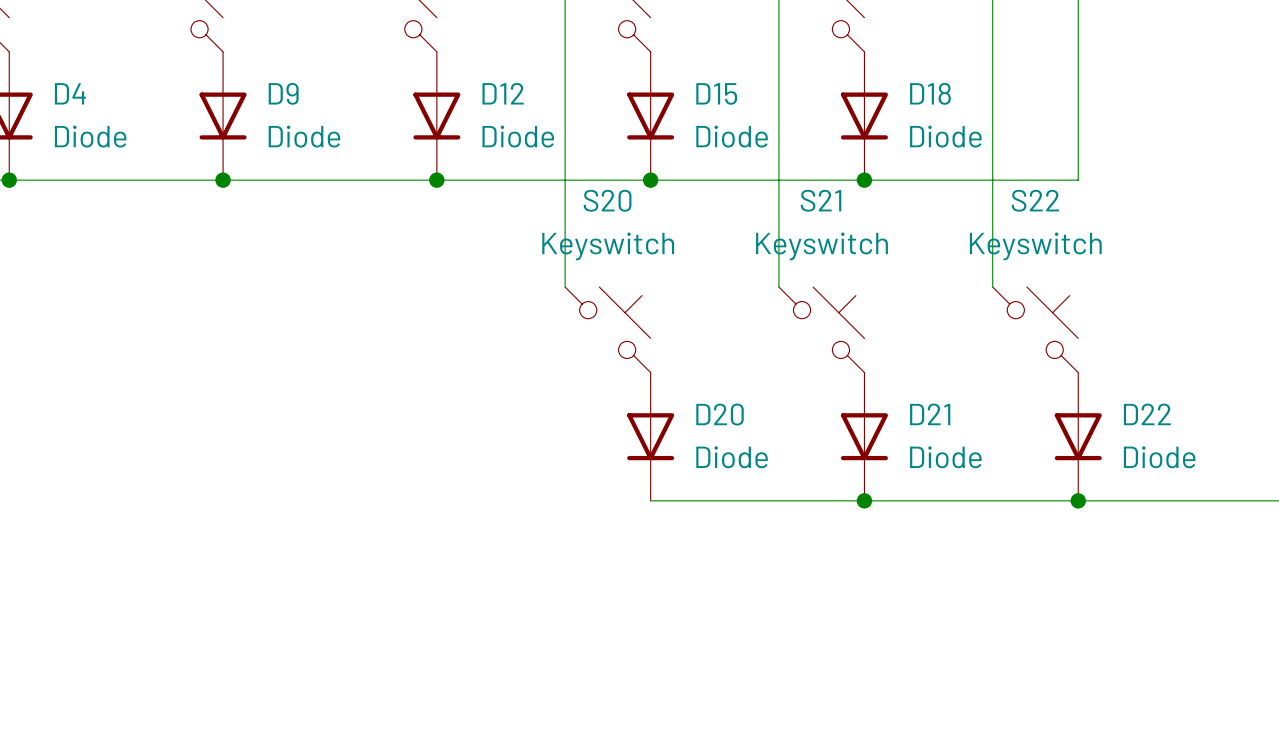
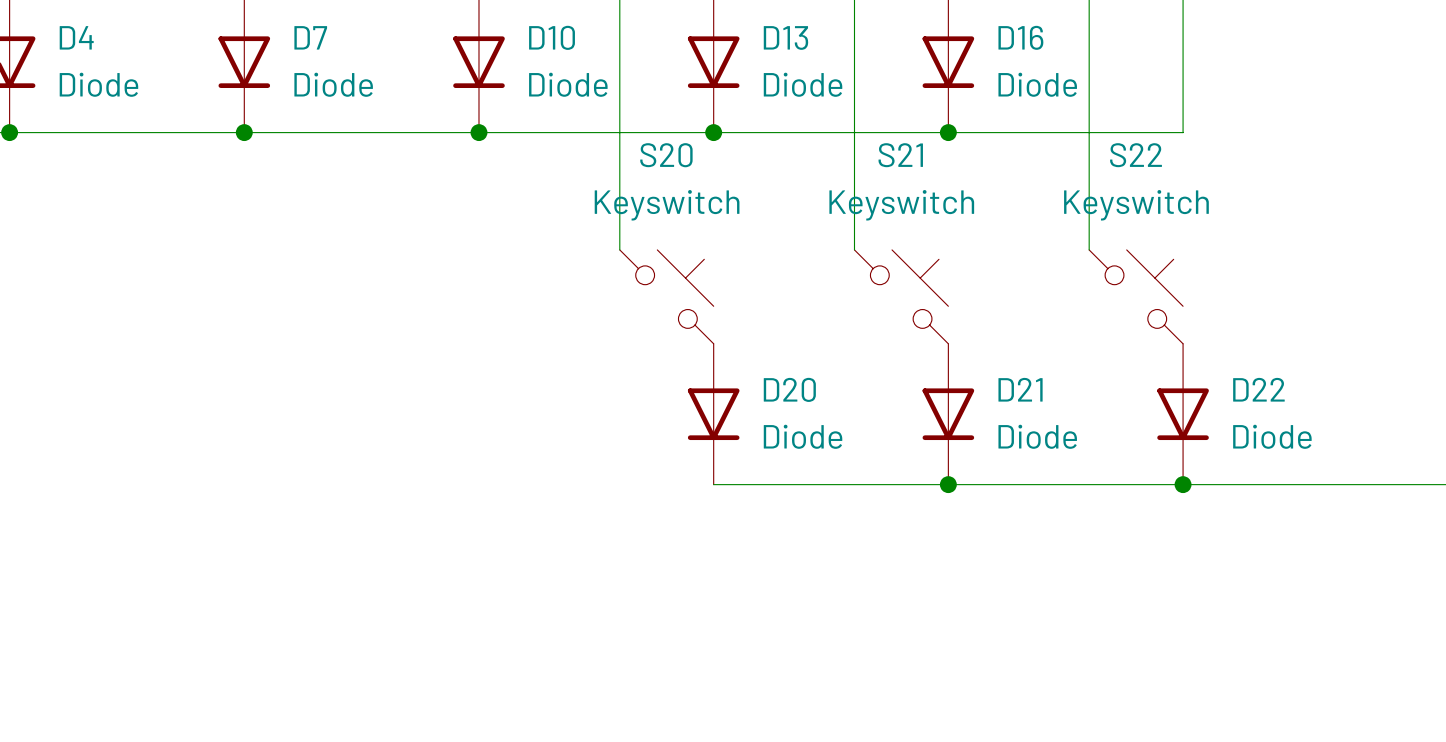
D9 name: D9 (283, 93) -> D7 (310, 37)
D12 name: D12 (503, 93) -> D10 (552, 37)
D15 name: D15 (716, 93) -> D13 (785, 37)
D18 name: D18 (930, 93) -> D16 (1020, 37)

